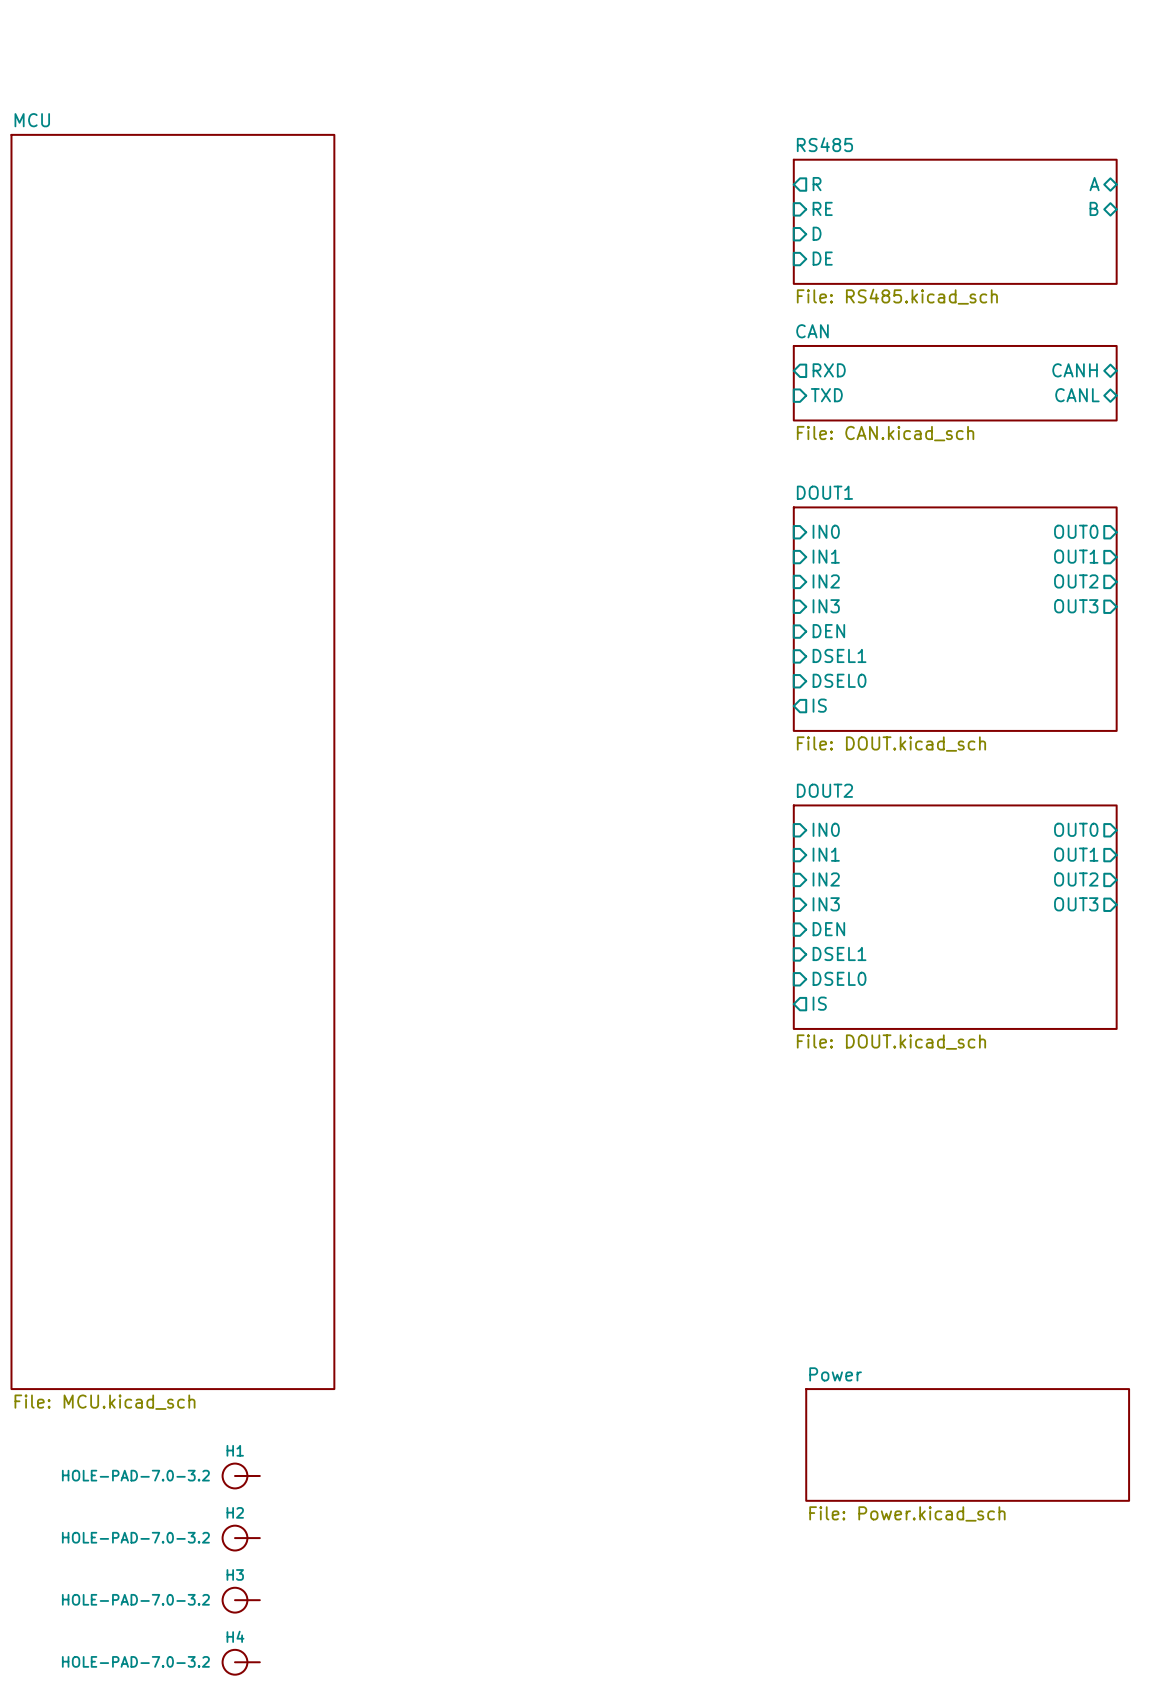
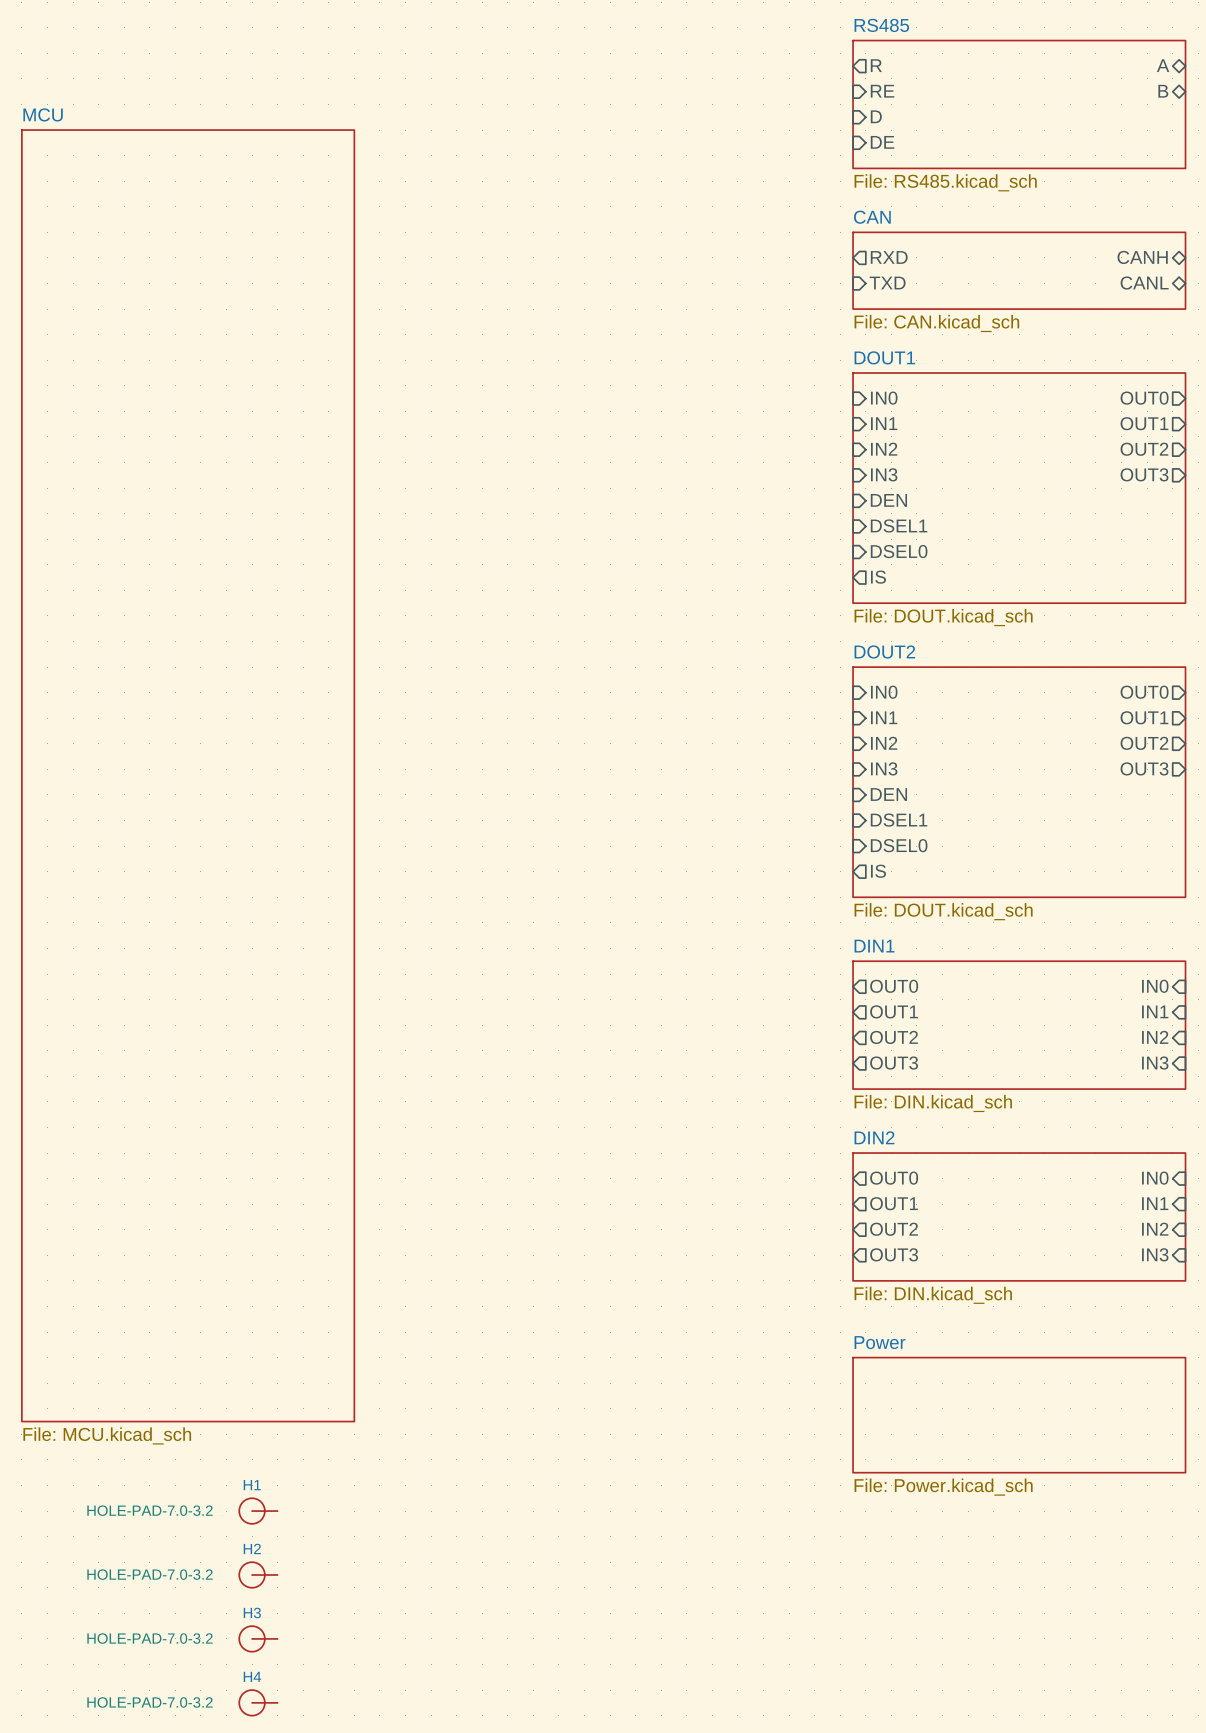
sheet pin position: R (817, 184) -> R (876, 65)
sheet pin position: A (1094, 184) -> A (1163, 65)
sheet pin position: RE (822, 208) -> RE (882, 91)
sheet pin position: B (1094, 208) -> B (1163, 91)
sheet RS485 position: (955, 221) -> (1019, 104)
sheet pin position: D (817, 233) -> D (876, 116)
sheet pin position: DE (822, 258) -> DE (882, 142)
sheet pin position: RXD (829, 370) -> RXD (889, 257)
sheet pin position: CANH (1075, 370) -> CANH (1142, 257)
sheet CAN position: (955, 383) -> (1019, 270)
sheet pin position: TXD (826, 395) -> TXD (887, 283)
sheet pin: none -> IN0 (884, 398)
sheet pin position: CANL (1077, 395) -> CANL (1144, 283)
sheet pin: none -> OUT0 (1144, 398)
sheet pin: none -> IN1 (884, 423)
sheet pin: none -> OUT1 (1144, 423)
sheet pin: none -> IN2 (884, 449)
sheet pin: none -> OUT2 (1144, 449)
sheet pin: none -> IN3 (884, 474)
sheet pin: none -> OUT3 (1144, 474)
sheet pin: none -> DEN (888, 500)
sheet pin: none -> DSEL1 (899, 525)
sheet pin: IN0 (826, 531) -> none
sheet pin: OUT0 (1076, 531) -> none
sheet pin: none -> DSEL0 (899, 551)
sheet pin: IN1 (826, 556) -> none
sheet pin: OUT1 (1076, 556) -> none
sheet pin: none -> IS (878, 577)
sheet pin: IN2 (826, 581) -> none
sheet pin: OUT2 (1076, 581) -> none
sheet pin: IN3 (826, 606) -> none
sheet pin: OUT3 (1076, 606) -> none
sheet DOUT1 position: (955, 619) -> (1019, 488)
sheet pin: DEN (828, 631) -> none
sheet pin: DSEL1 (839, 655) -> none
sheet pin: DSEL0 (839, 680) -> none
sheet pin: none -> IN0 (884, 692)
sheet pin: none -> OUT0 (1144, 692)
sheet pin: IS (819, 705) -> none
sheet pin: none -> IN1 (884, 717)
sheet pin: none -> OUT1 (1144, 717)
sheet pin: none -> IN2 (884, 743)
sheet pin: none -> OUT2 (1144, 743)
sheet pin: none -> IN3 (884, 768)
sheet pin: none -> OUT3 (1144, 768)
sheet pin: none -> DEN (888, 794)
sheet pin: none -> DSEL1 (899, 820)
sheet pin: IN0 (826, 829) -> none
sheet pin: none -> DSEL0 (899, 845)
sheet pin: OUT0 (1076, 829) -> none
sheet pin: IN1 (826, 854) -> none
sheet pin: none -> IS (878, 871)
sheet pin: OUT1 (1076, 854) -> none
sheet pin: IN2 (826, 879) -> none
sheet pin: OUT2 (1076, 879) -> none
sheet pin: IN3 (826, 904) -> none
sheet pin: OUT3 (1076, 904) -> none
sheet DOUT2 position: (955, 917) -> (1019, 782)
sheet pin: DEN (828, 929) -> none
sheet pin: DSEL1 (839, 953) -> none
sheet pin: none -> OUT0 (894, 986)
sheet pin: none -> IN0 (1155, 986)
sheet pin: DSEL0 (839, 978) -> none
sheet pin: none -> OUT1 (894, 1011)
sheet pin: none -> IN1 (1155, 1011)
sheet pin: IS (819, 1003) -> none
sheet DIN1: none -> File: DIN.kicad_sch (1019, 1025)
sheet pin: none -> OUT2 (894, 1037)
sheet pin: none -> IN2 (1155, 1037)
sheet pin: none -> OUT3 (894, 1063)
sheet pin: none -> IN3 (1155, 1063)
sheet pin: none -> OUT0 (894, 1178)
sheet pin: none -> IN0 (1155, 1178)
sheet pin: none -> OUT1 (894, 1203)
sheet pin: none -> IN1 (1155, 1203)
sheet DIN2: none -> File: DIN.kicad_sch (1019, 1216)
sheet pin: none -> OUT2 (894, 1229)
sheet pin: none -> IN2 (1155, 1229)
sheet pin: none -> OUT3 (894, 1254)
sheet pin: none -> IN3 (1155, 1254)
sheet Power position: (967, 1444) -> (1019, 1415)

